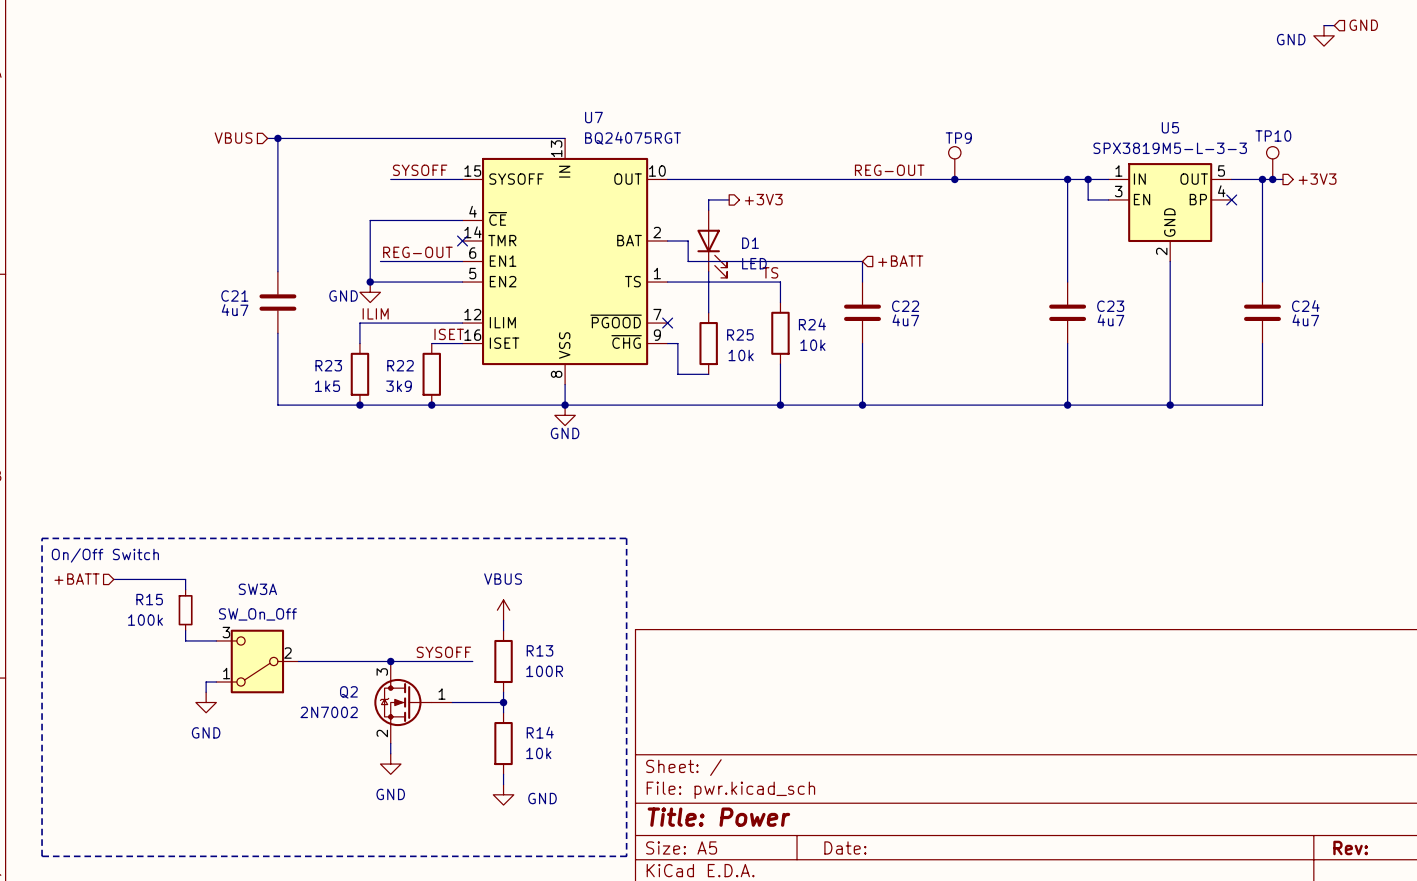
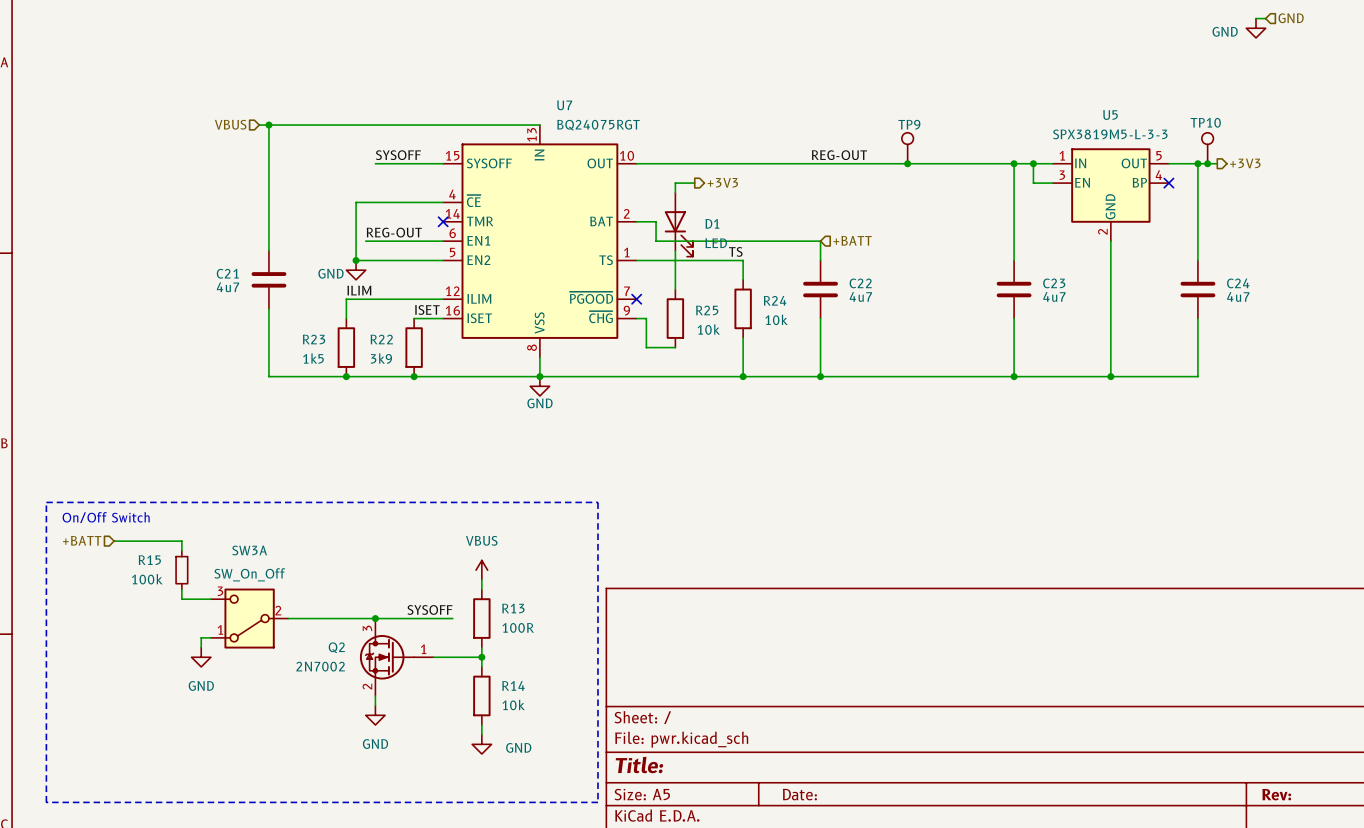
title block: Title: Power (718, 817) -> Title: (639, 764)

